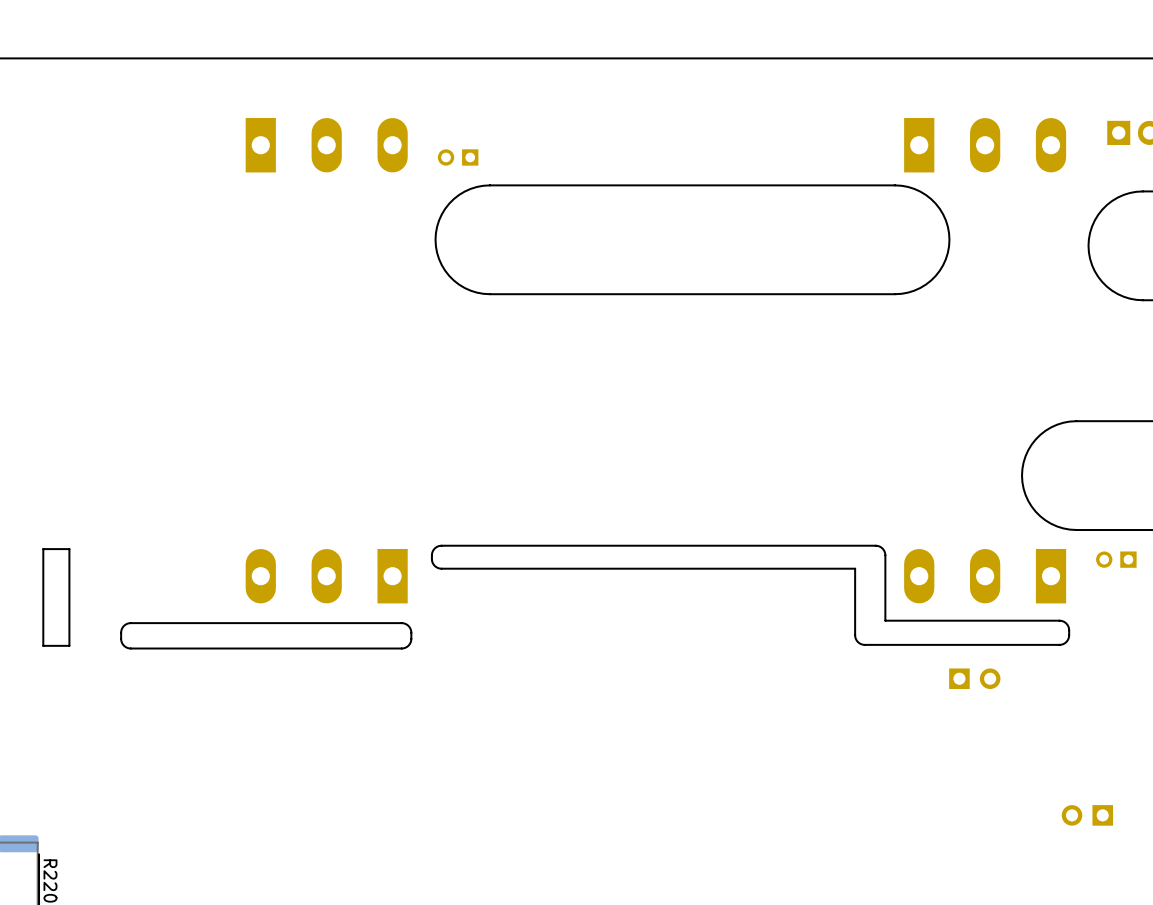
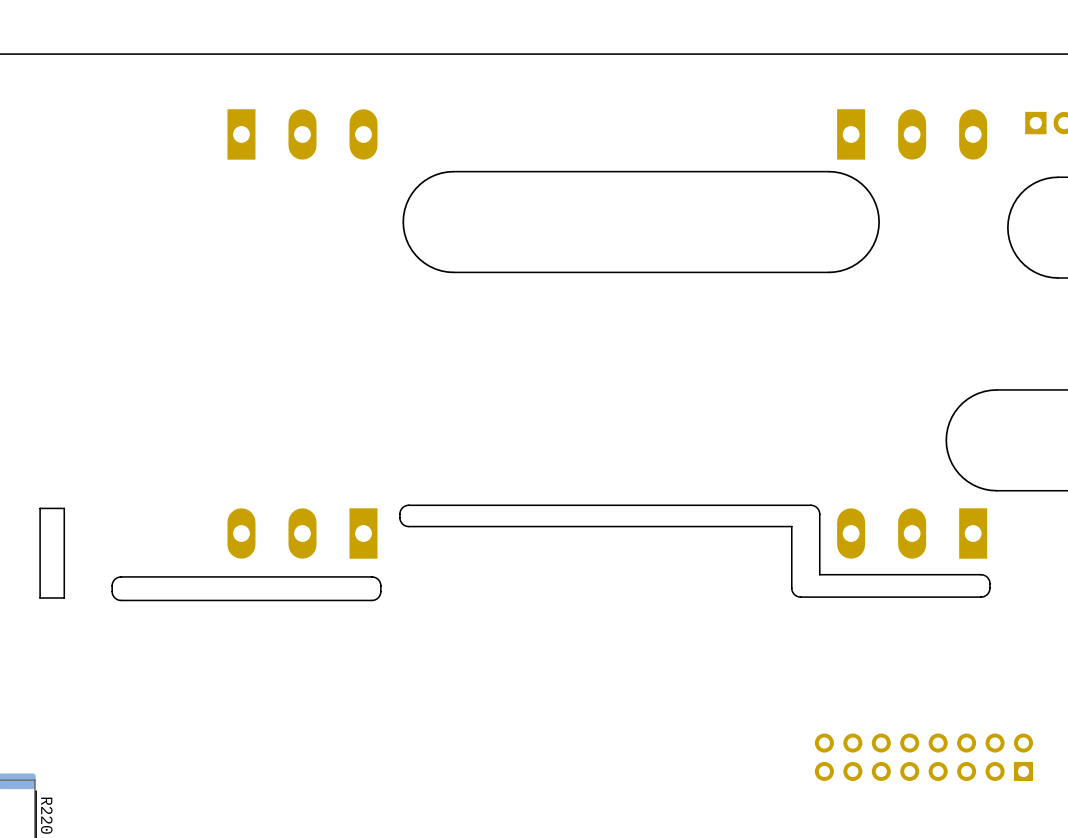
part: (458, 157) -> none
part: (1116, 559) -> none
part: (974, 678) -> none
part: (1087, 815) -> none
part: none -> (923, 757)

